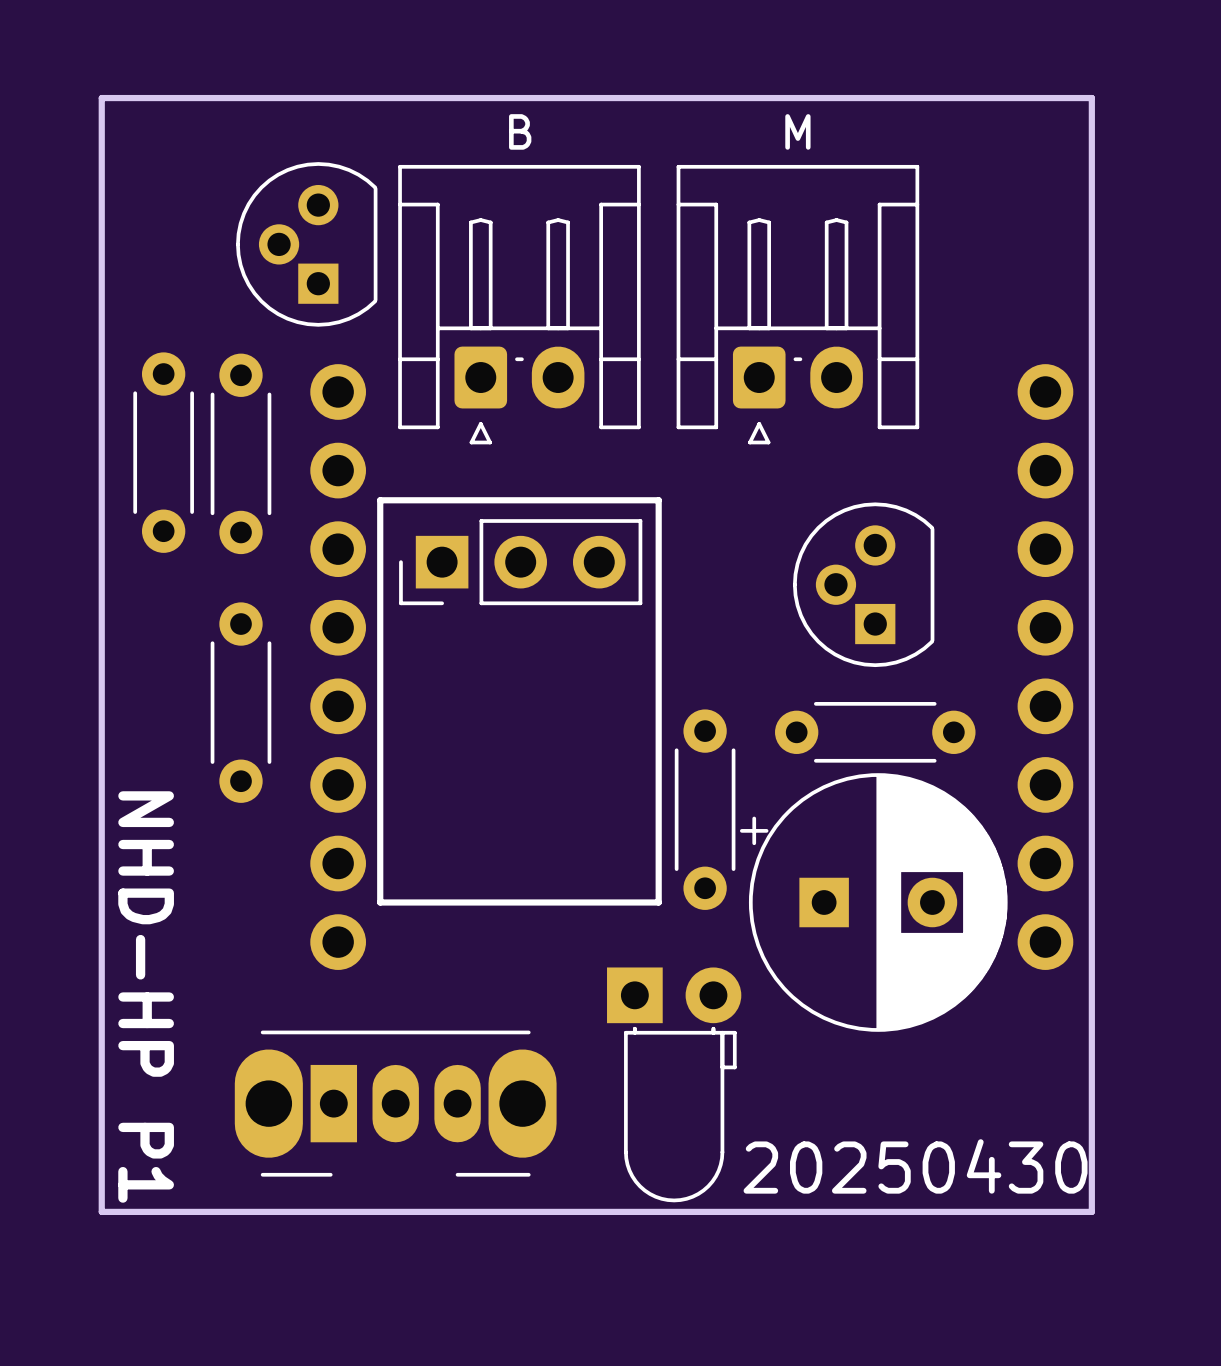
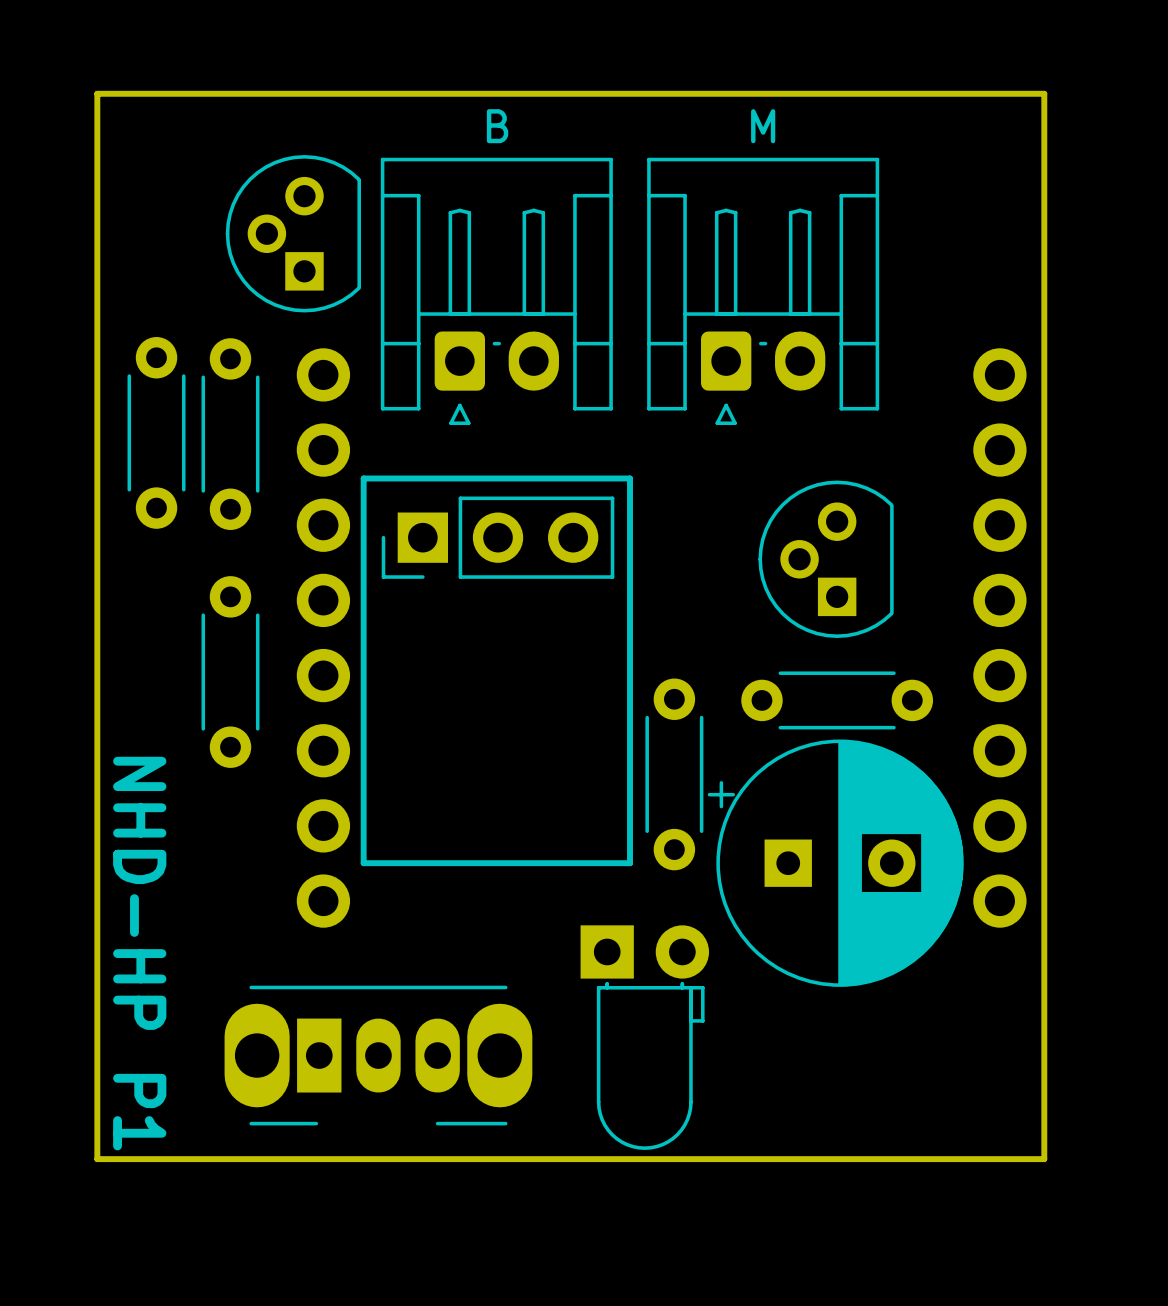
text: 20250430 (915, 1166) -> none

